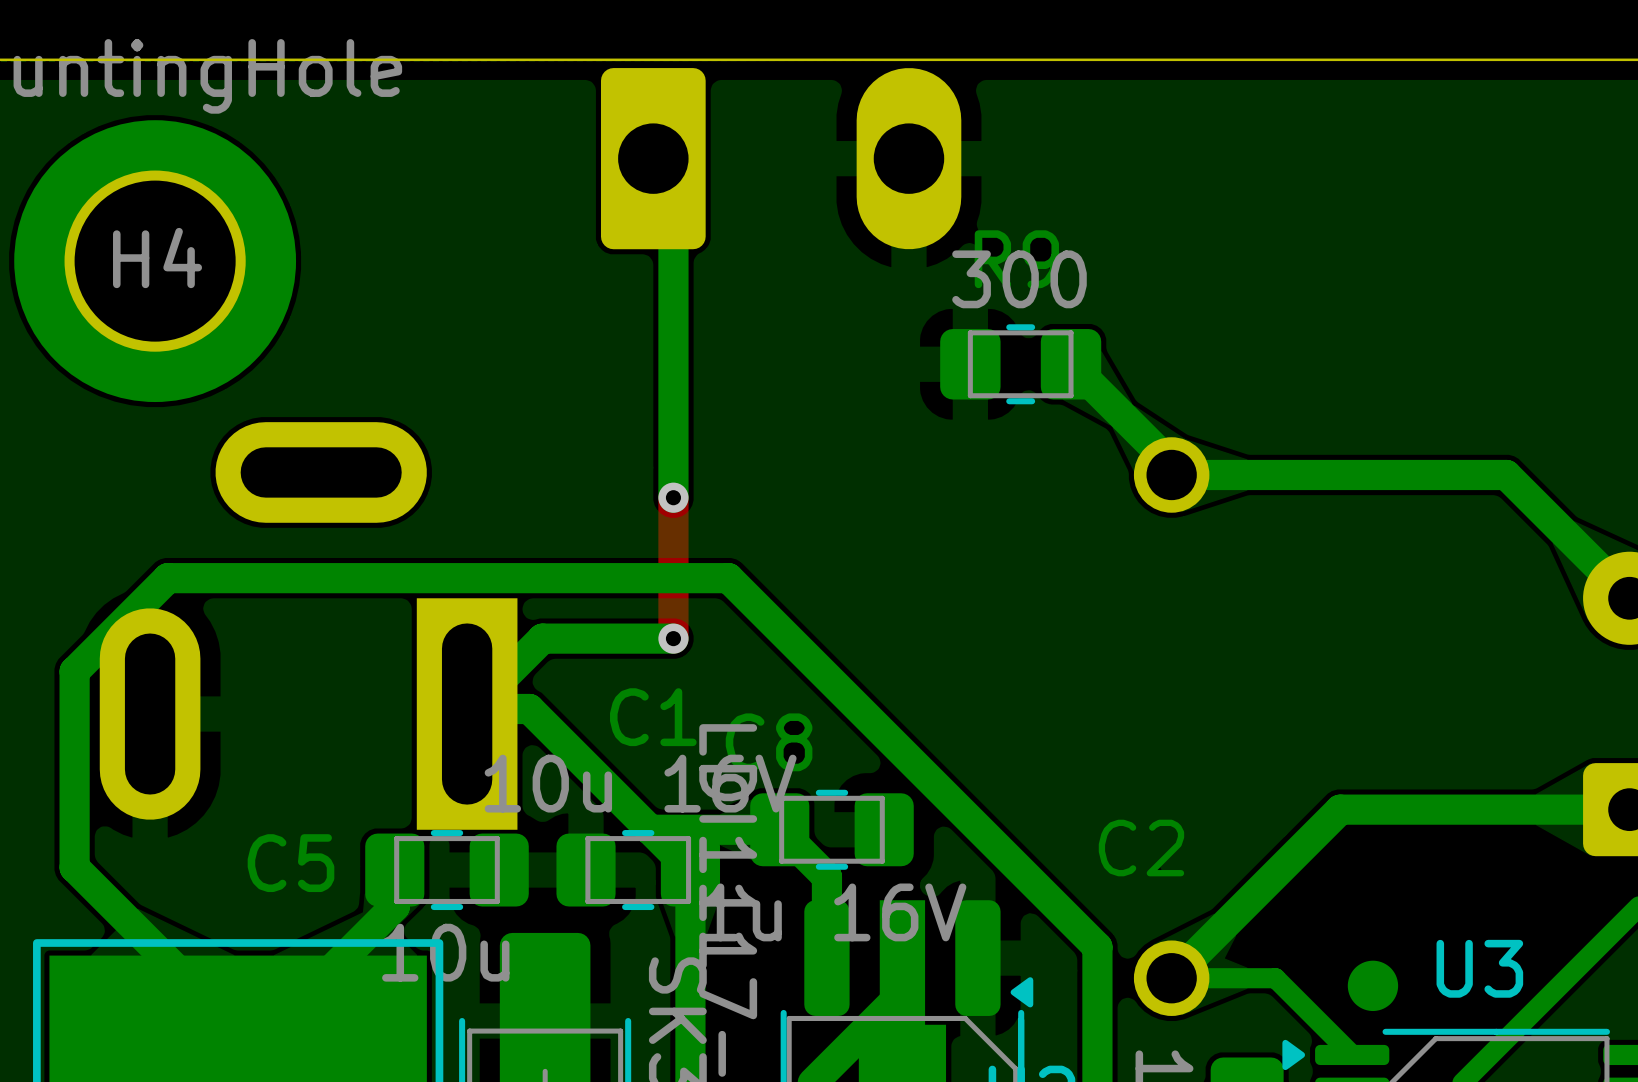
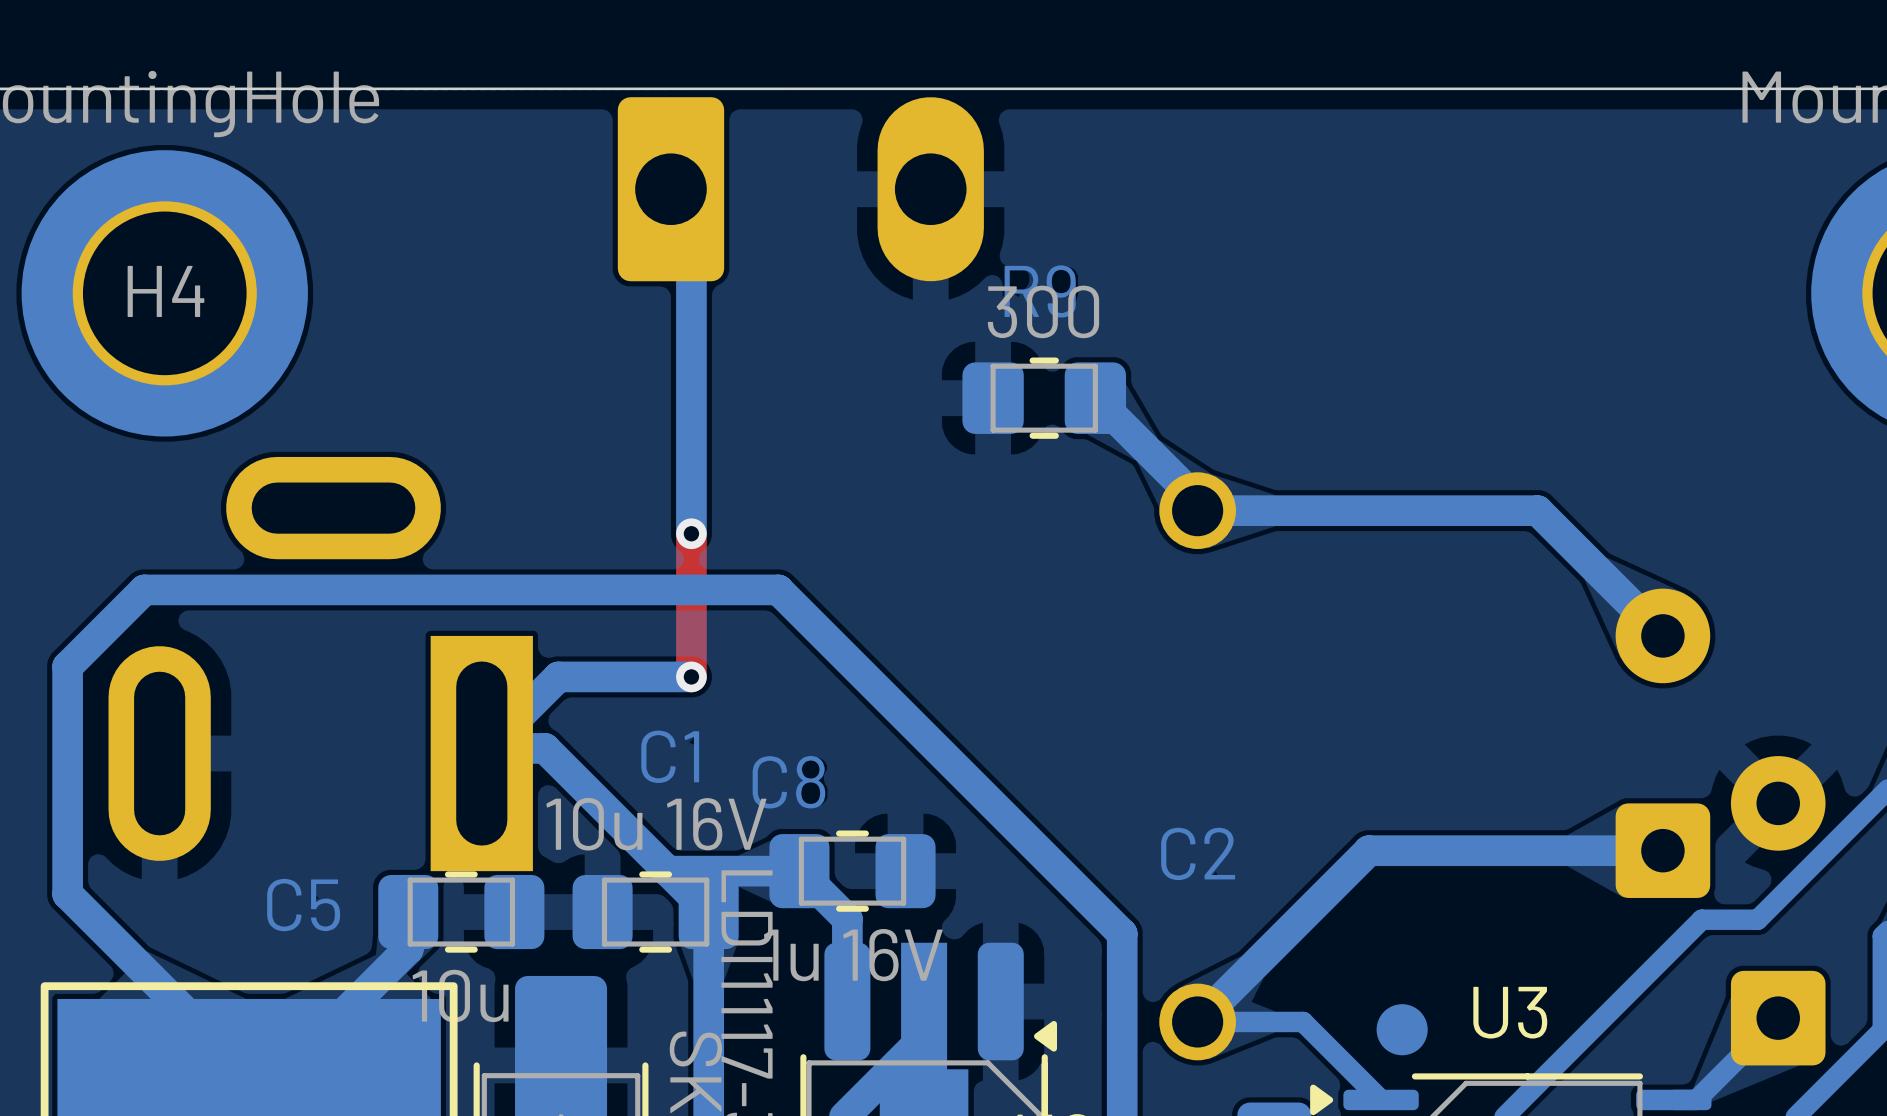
C2 name position: C2 (1141, 848) -> C2 (1198, 853)
bottom track: (74, 867) (74, 671) (167, 578) (728, 578) (1097, 947) -> (82, 909) (67, 894) (67, 666) (144, 589) (778, 589) (1122, 933) (1122, 990)

